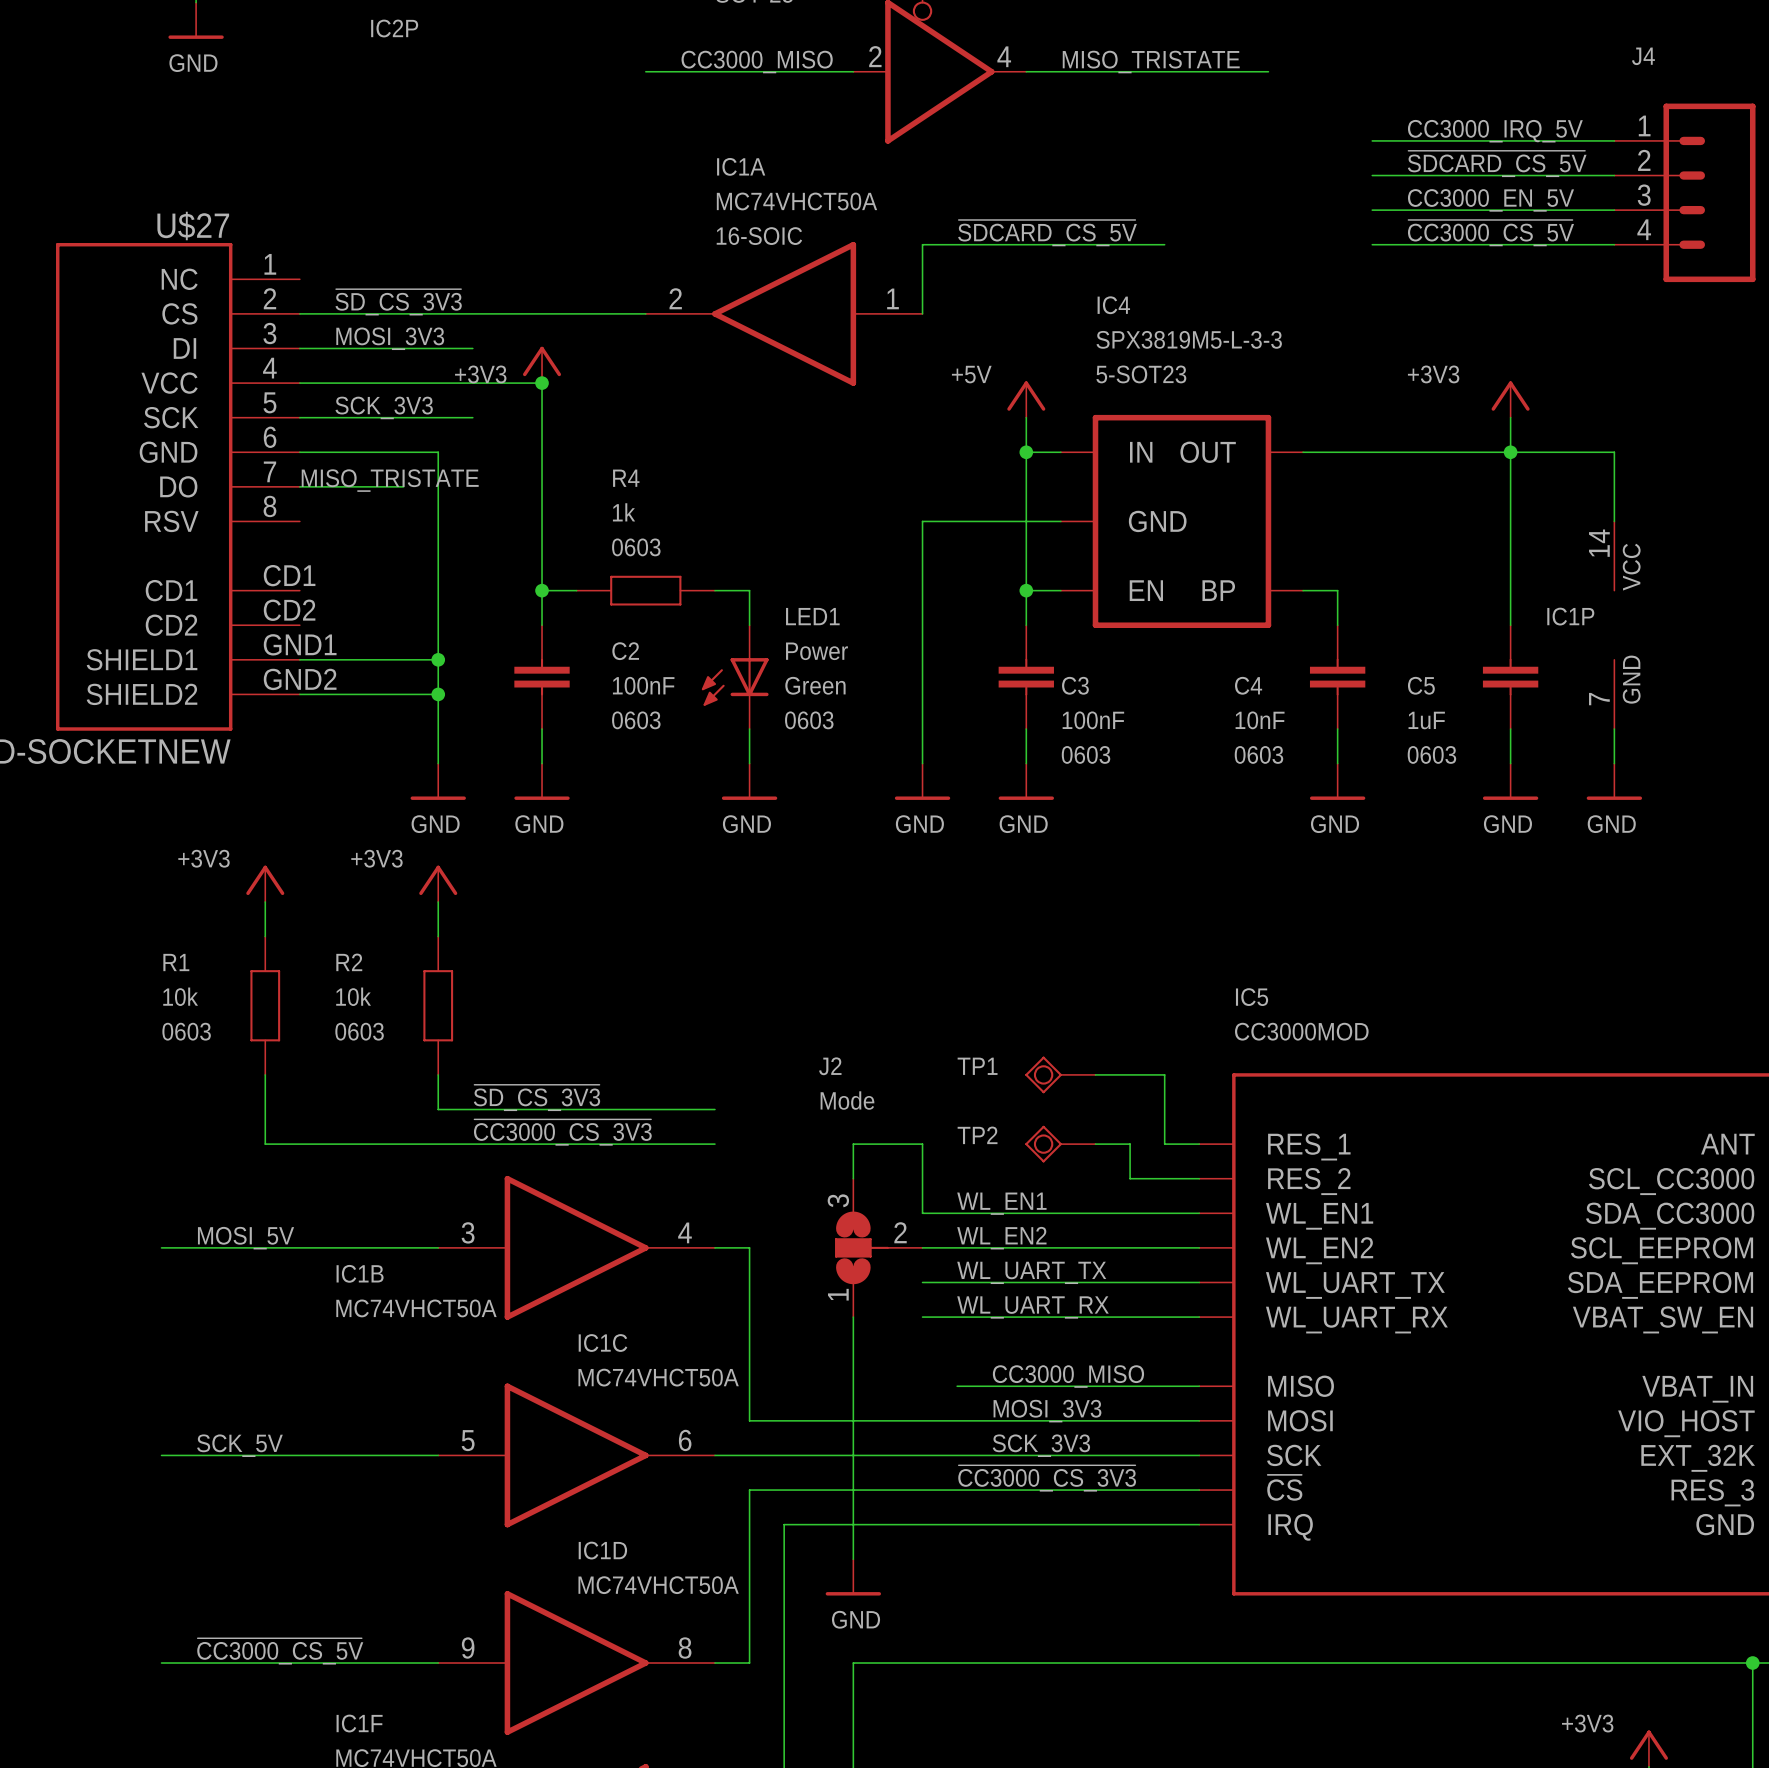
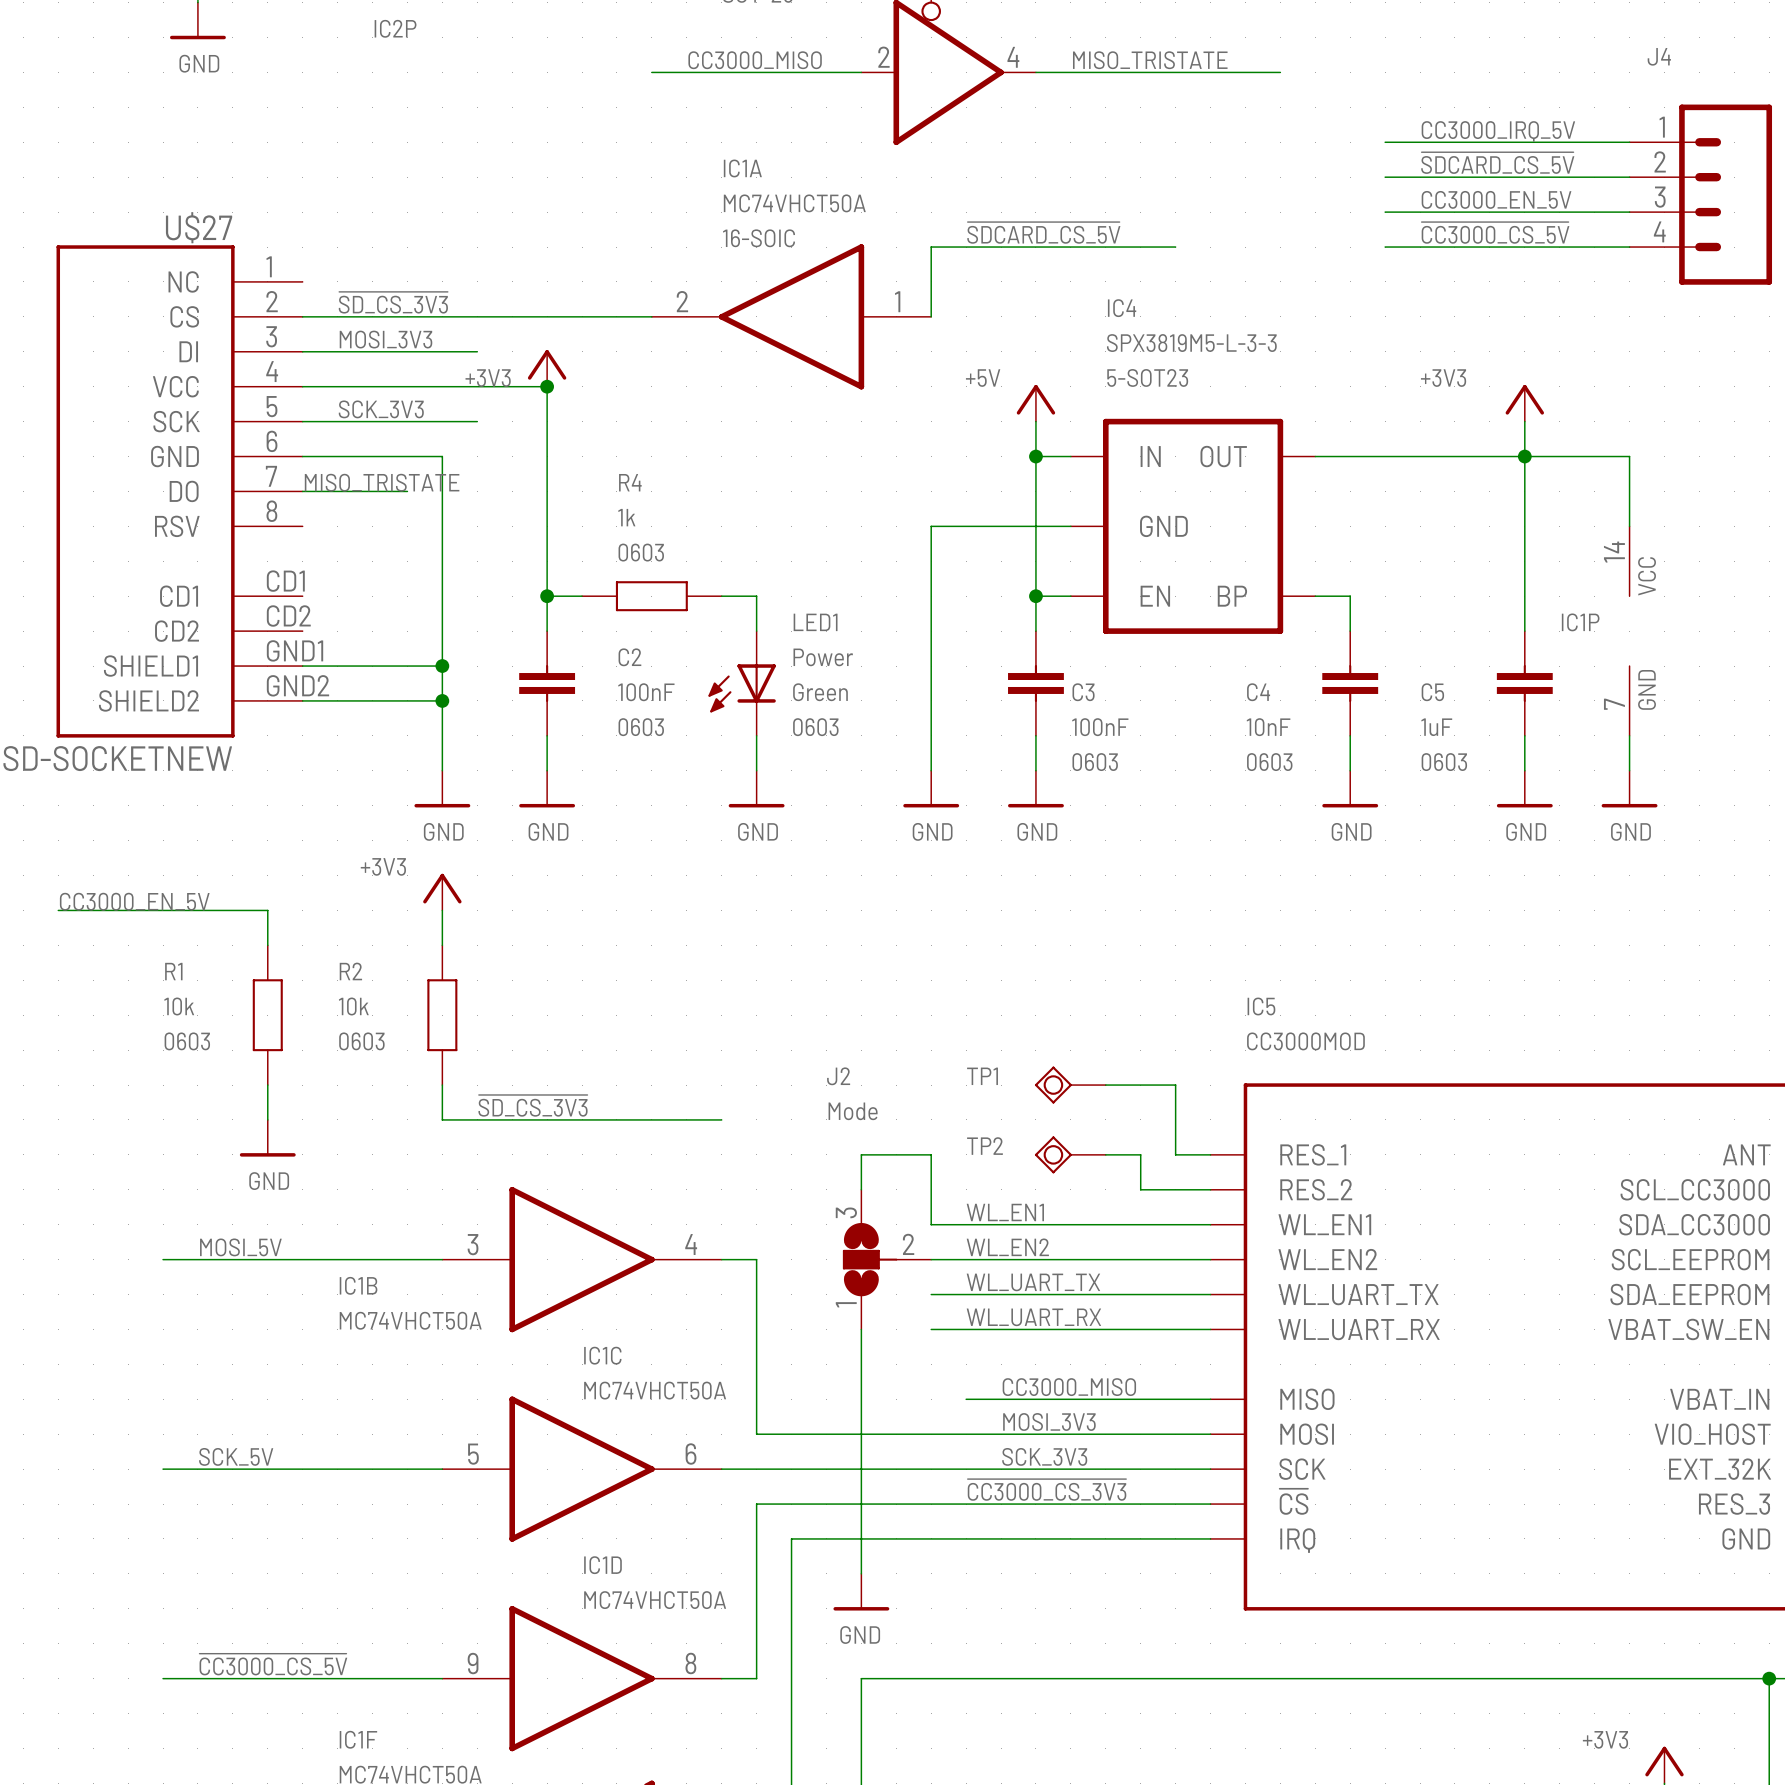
power symbol: +3V3 (265, 883) -> none
label: none -> CC3000_EN_5V (134, 901)
wire: none -> (58, 910) (267, 910)
wire: (265, 1109) (265, 1144) (714, 1144) -> none
power symbol: none -> GND (267, 1138)
label: ~{CC3000_CS_3V3} (562, 1132) -> none

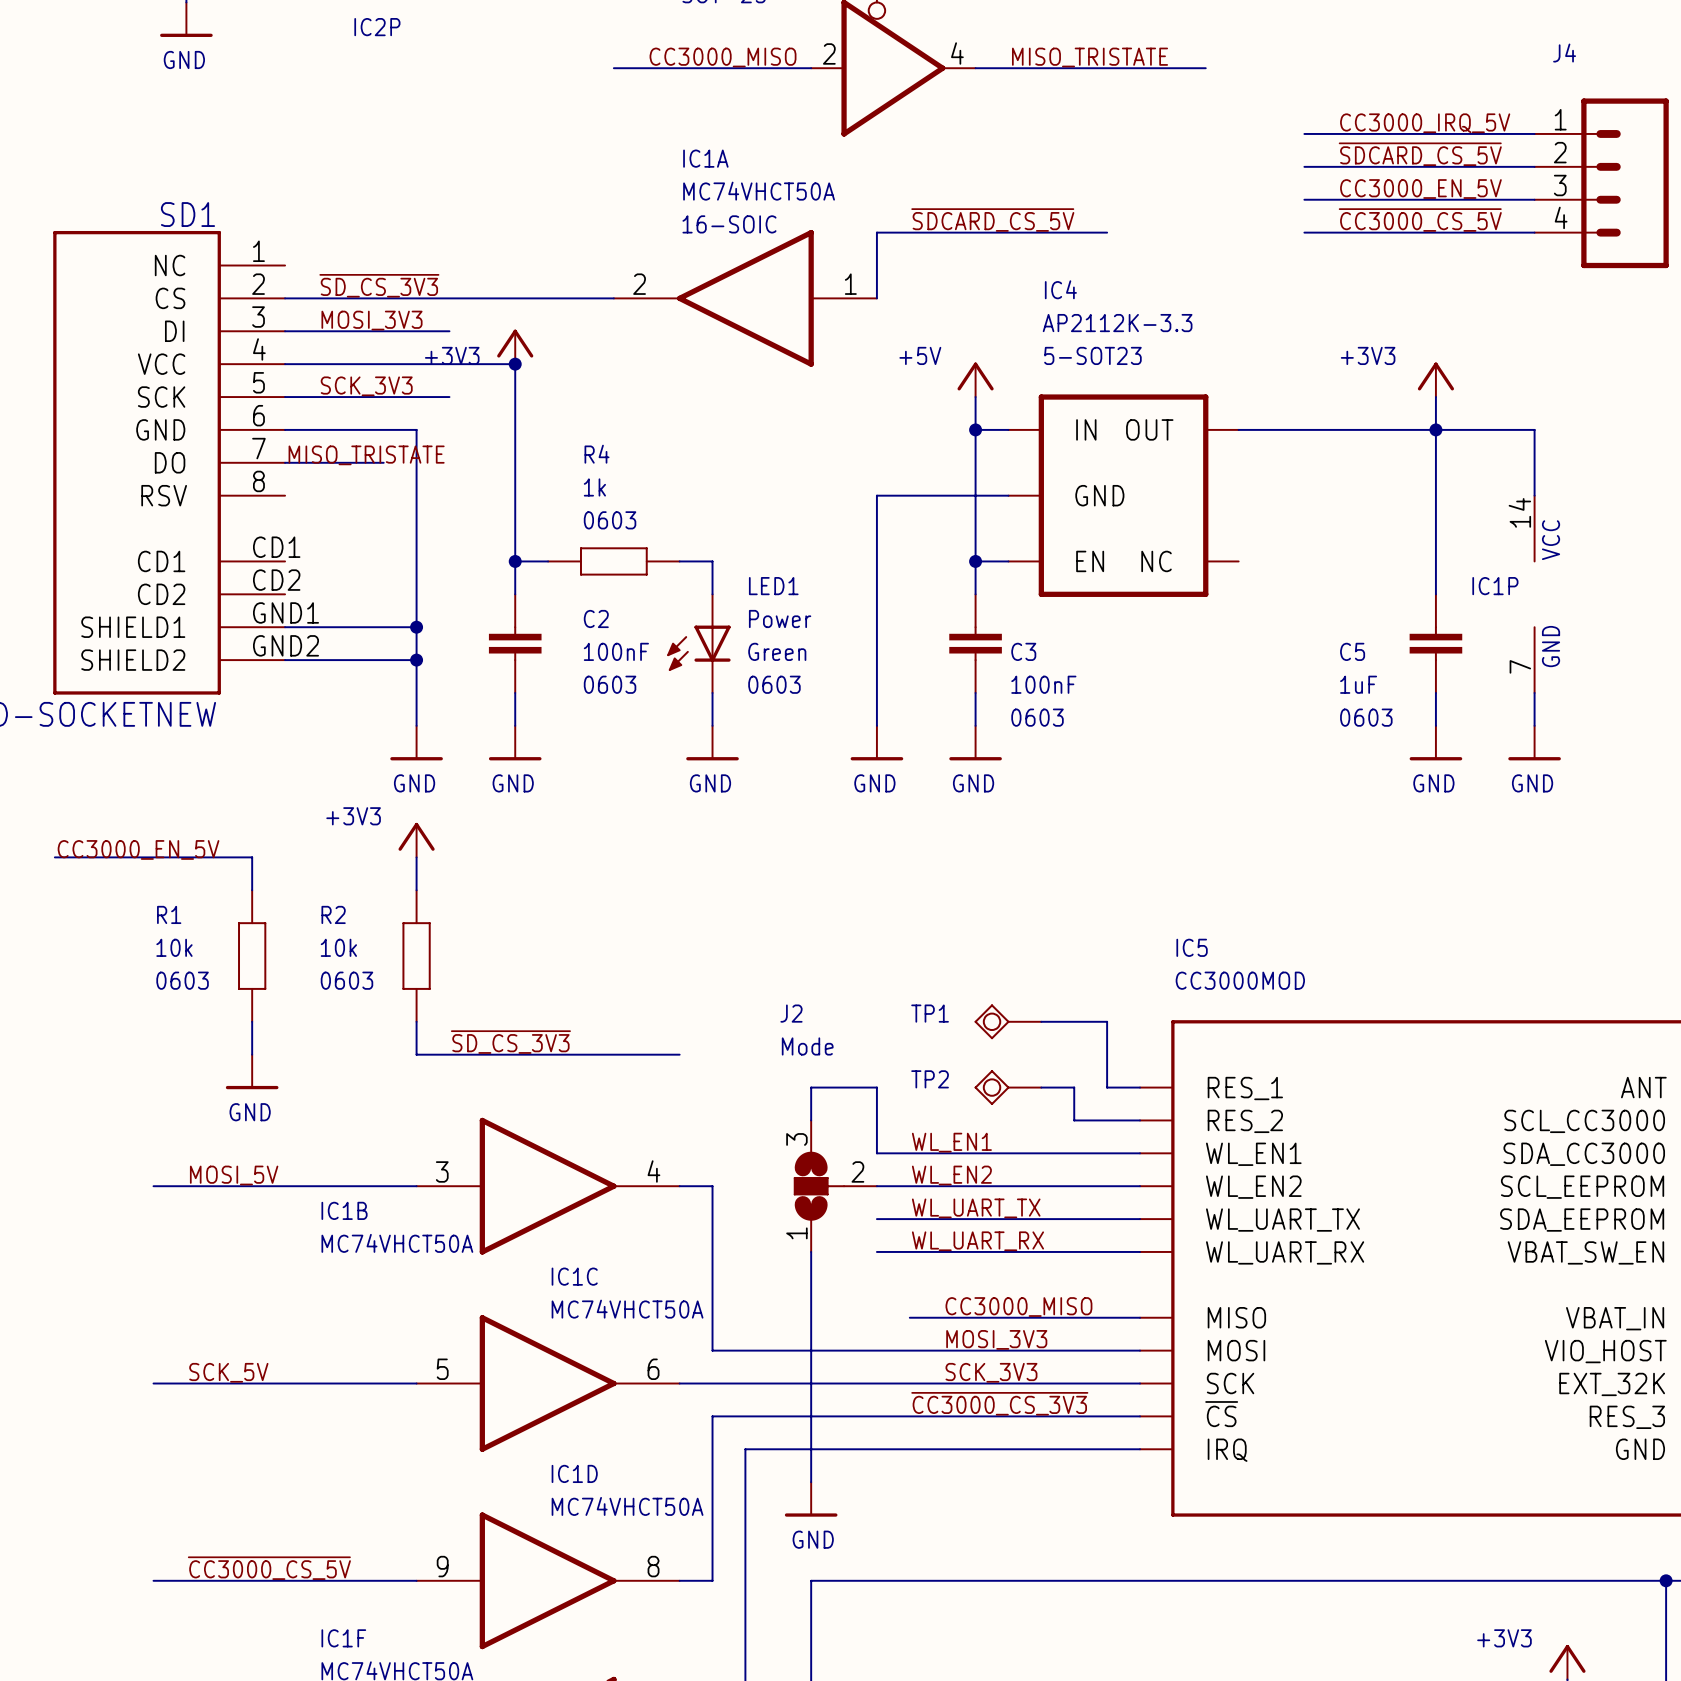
U$27 name: U$27 (199, 227) -> SD1 (187, 214)
IC4 value: SPX3819M5-L-3-3 (1191, 343) -> AP2112K-3.3 (1117, 323)
IC4 pin name: BP (1232, 596) -> NC (1156, 561)
wire: (1315, 596) (1350, 596) (1350, 631) -> none
C4: 10nF (1350, 683) -> none
wire: (1350, 735) (1350, 770) -> none
power symbol: GND (1350, 789) -> none

